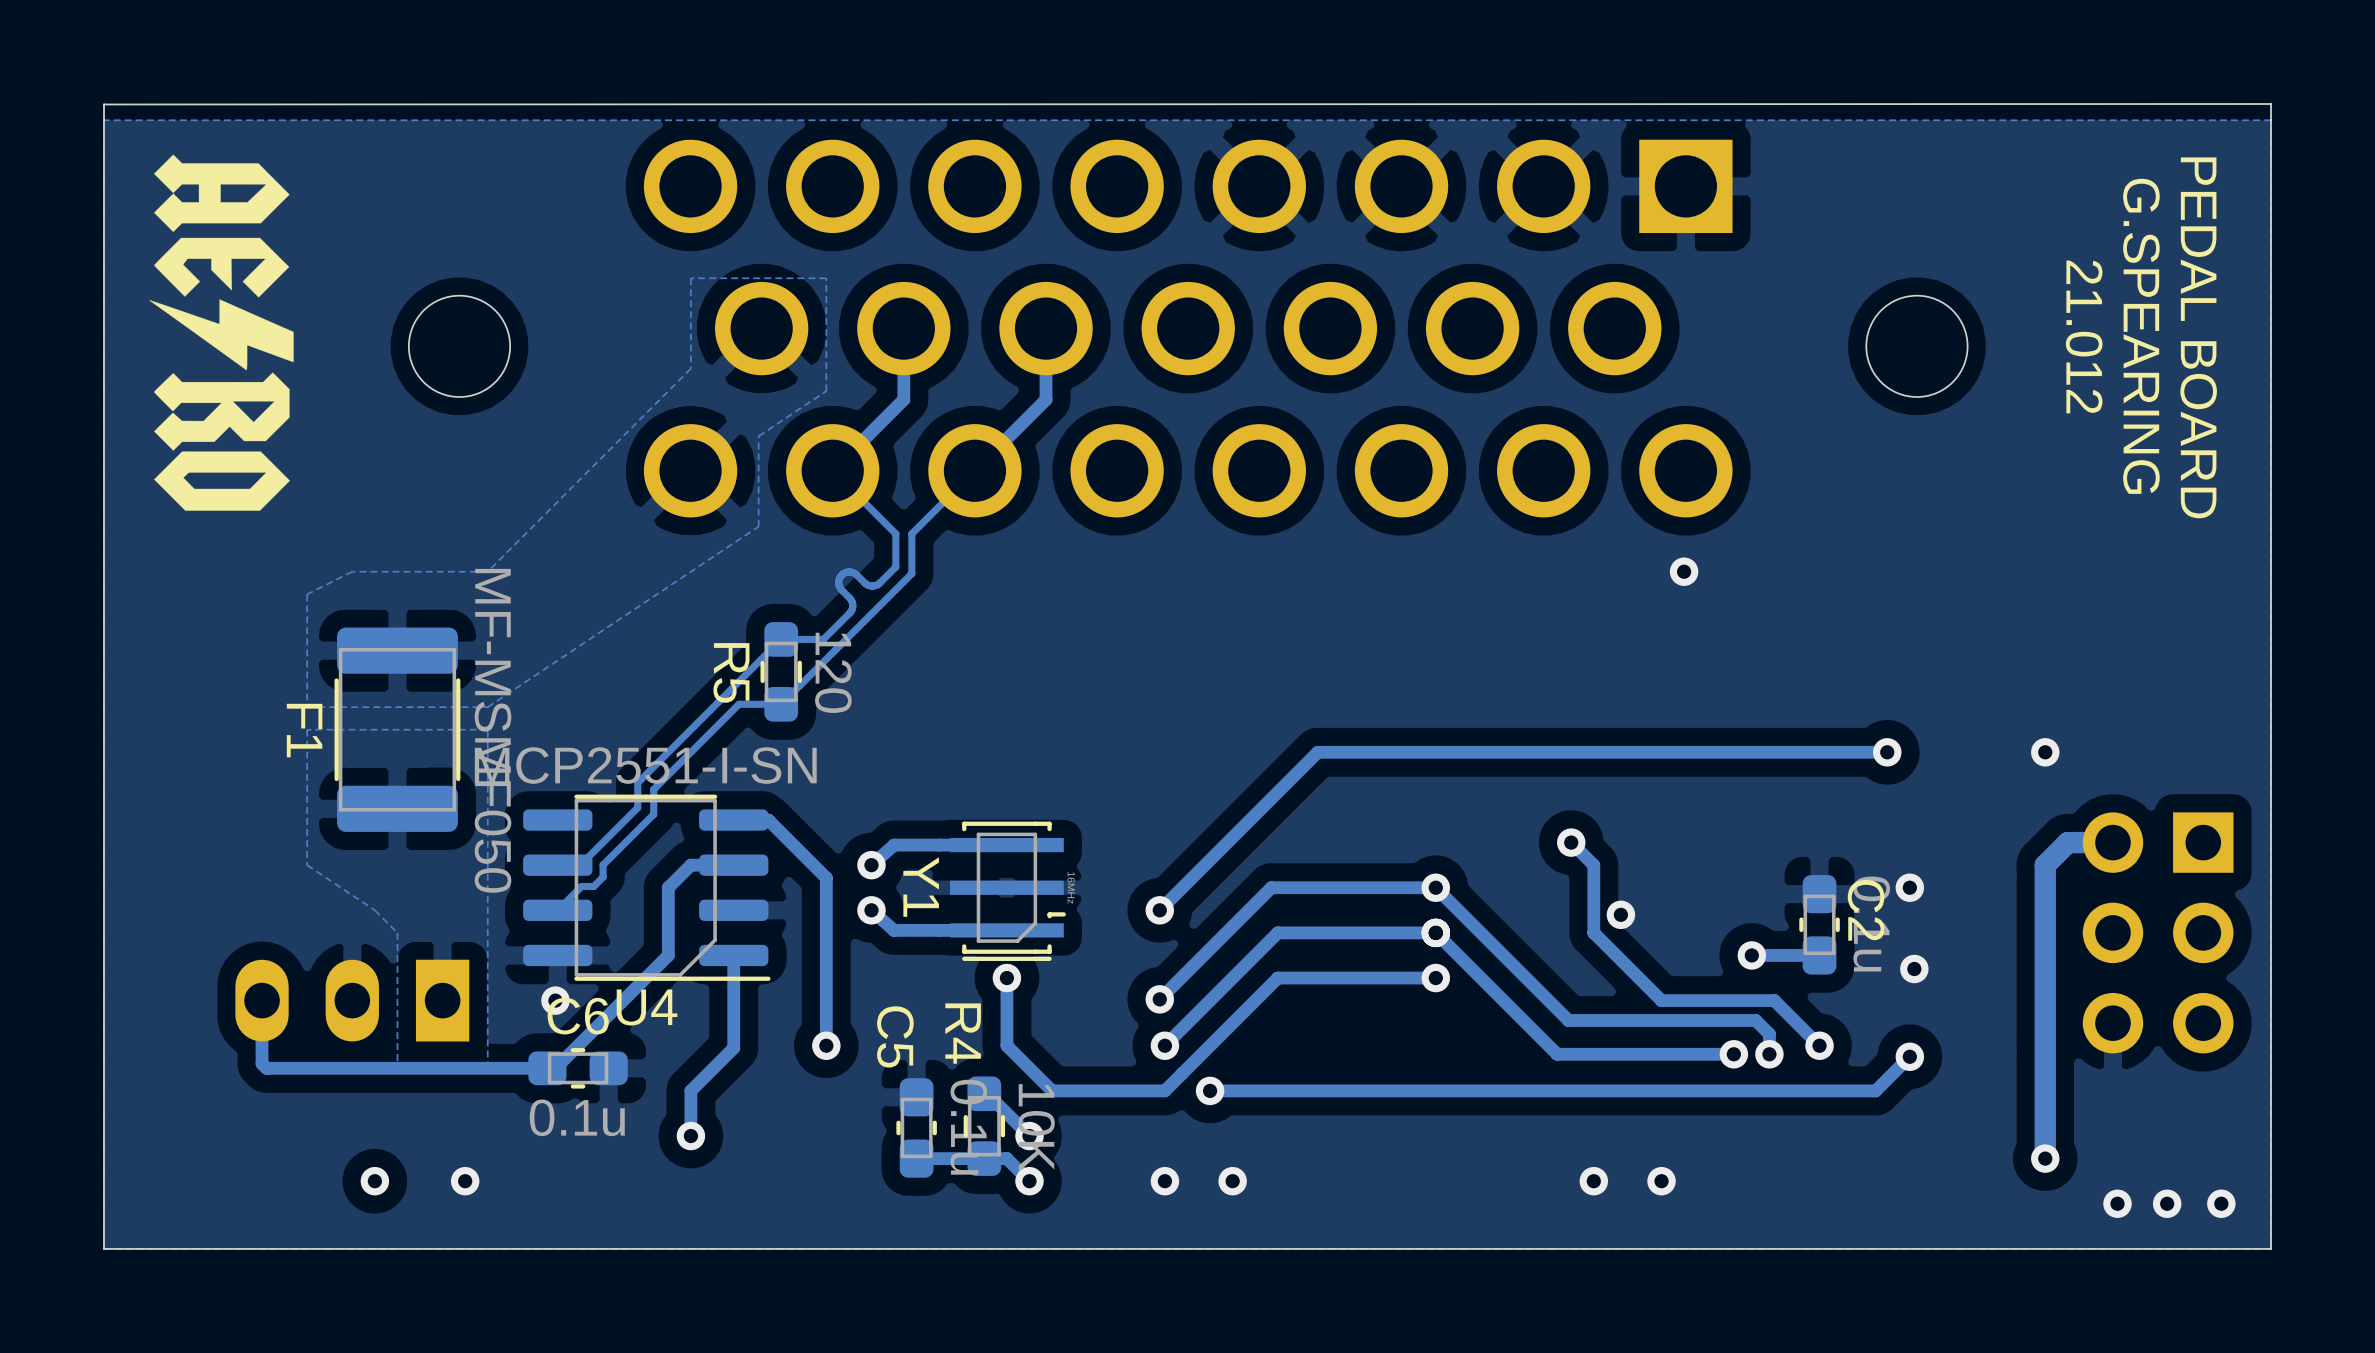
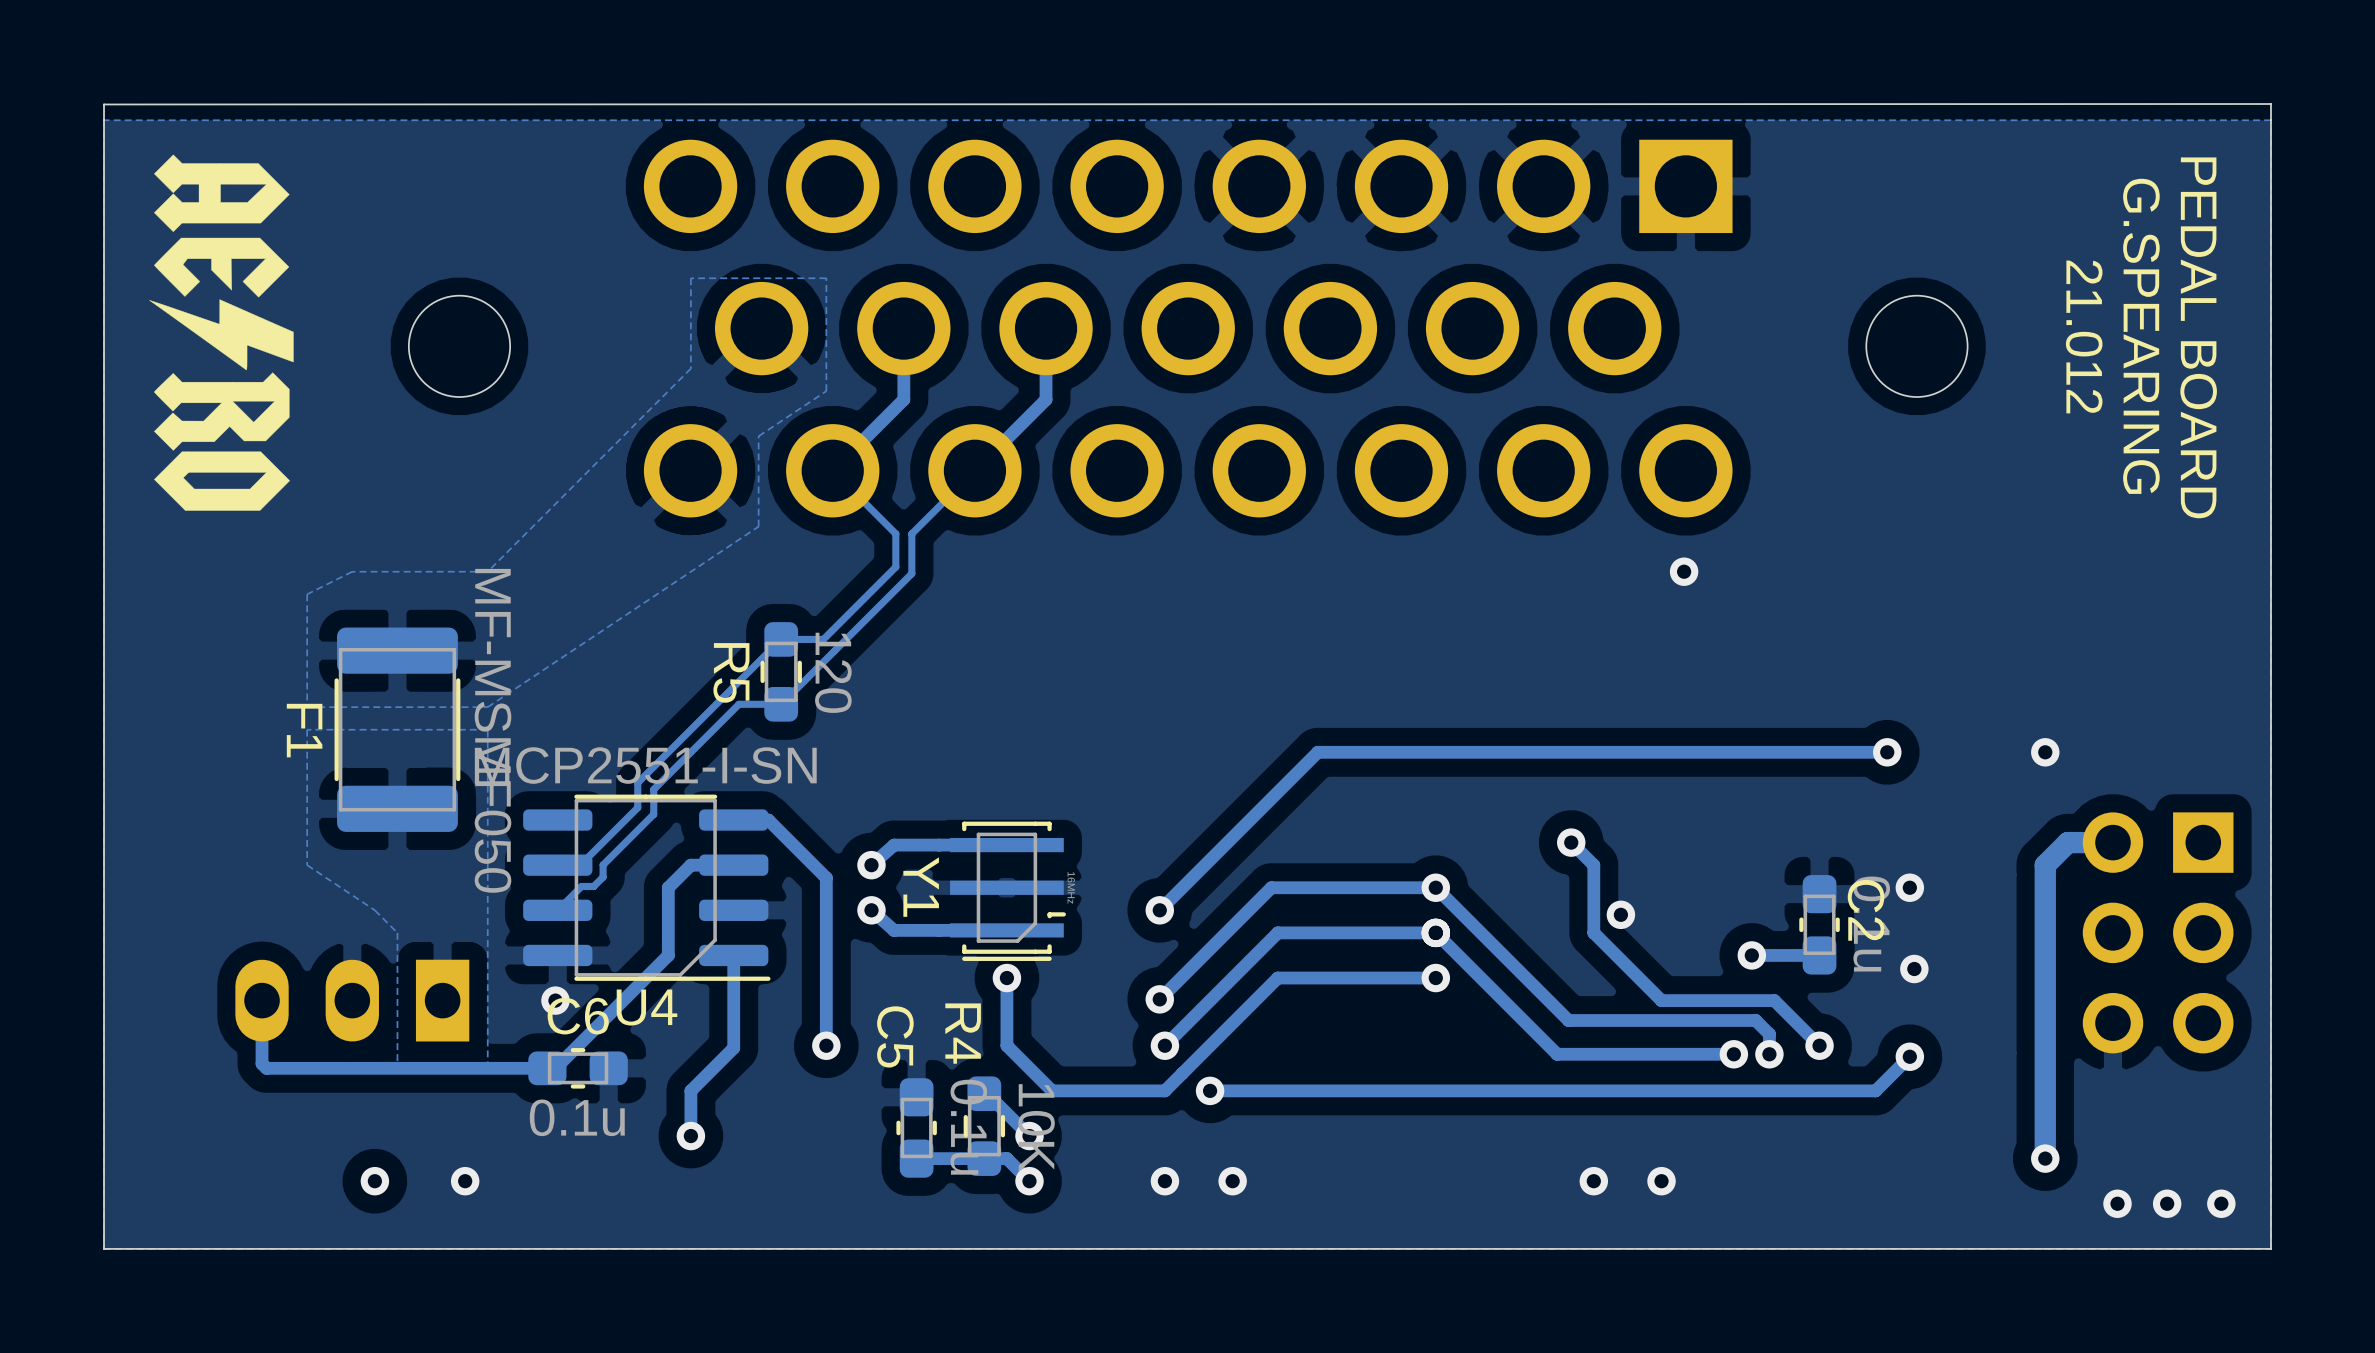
track: (879, 583) (873, 586) (868, 585) (850, 571) (841, 575) (838, 583) (852, 602) (852, 606) (849, 613) -> (879, 583) (849, 613)

